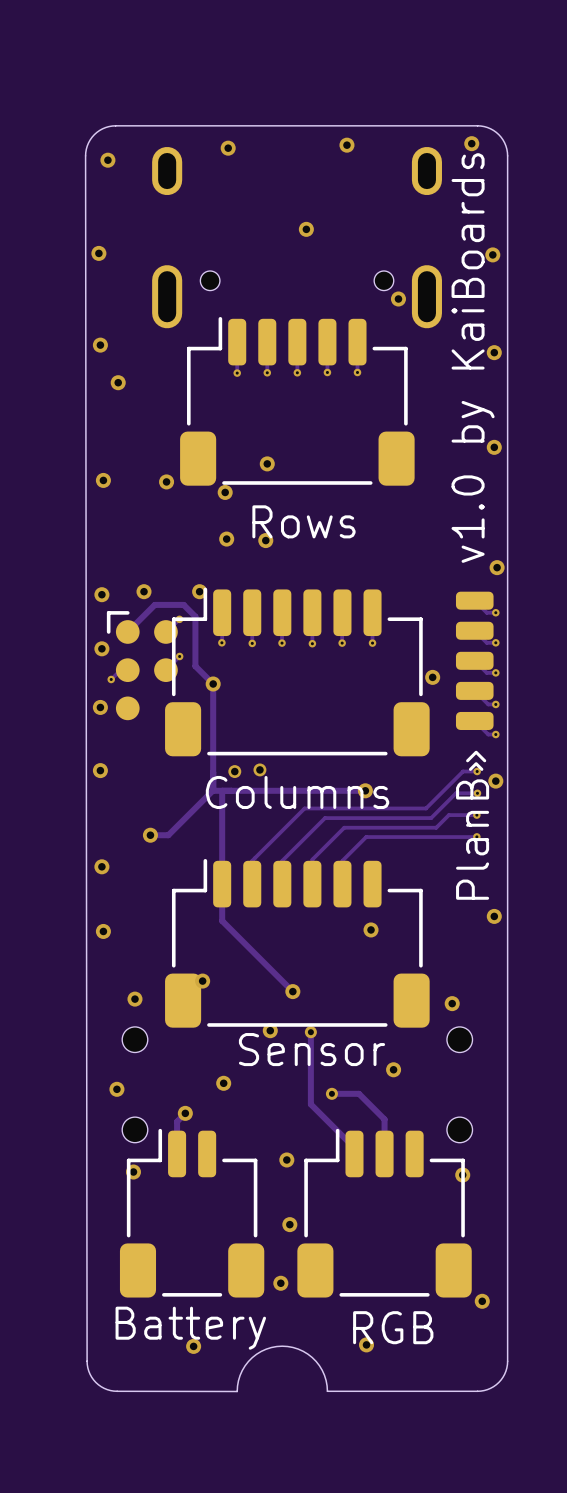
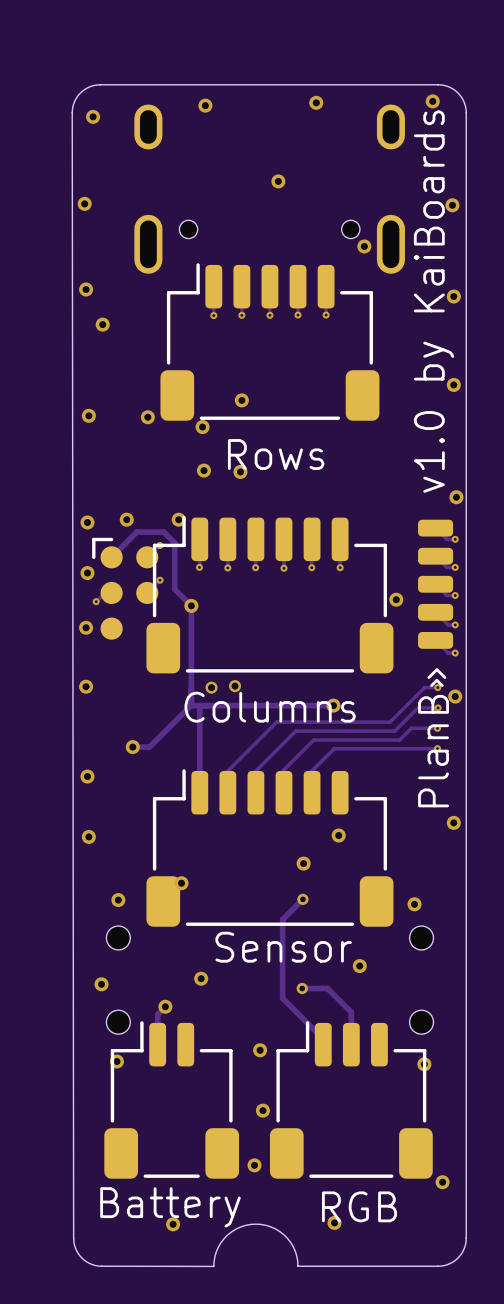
track: (222, 884) (222, 920) (292, 991) -> none
via: none -> (303, 863)
via: (292, 991) -> none
track: none -> (302, 899) (282, 919) (282, 930)
via: (270, 1030) -> none
via position: (310, 1032) -> (302, 899)

